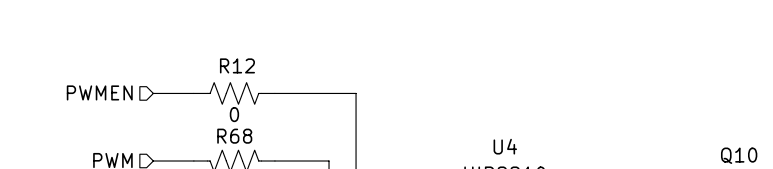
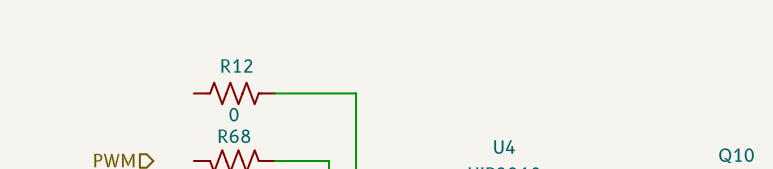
hierarchical label: PWMEN (99, 92) -> none
wire: (153, 93) (193, 93) -> none
wire: (153, 161) (193, 161) -> none

